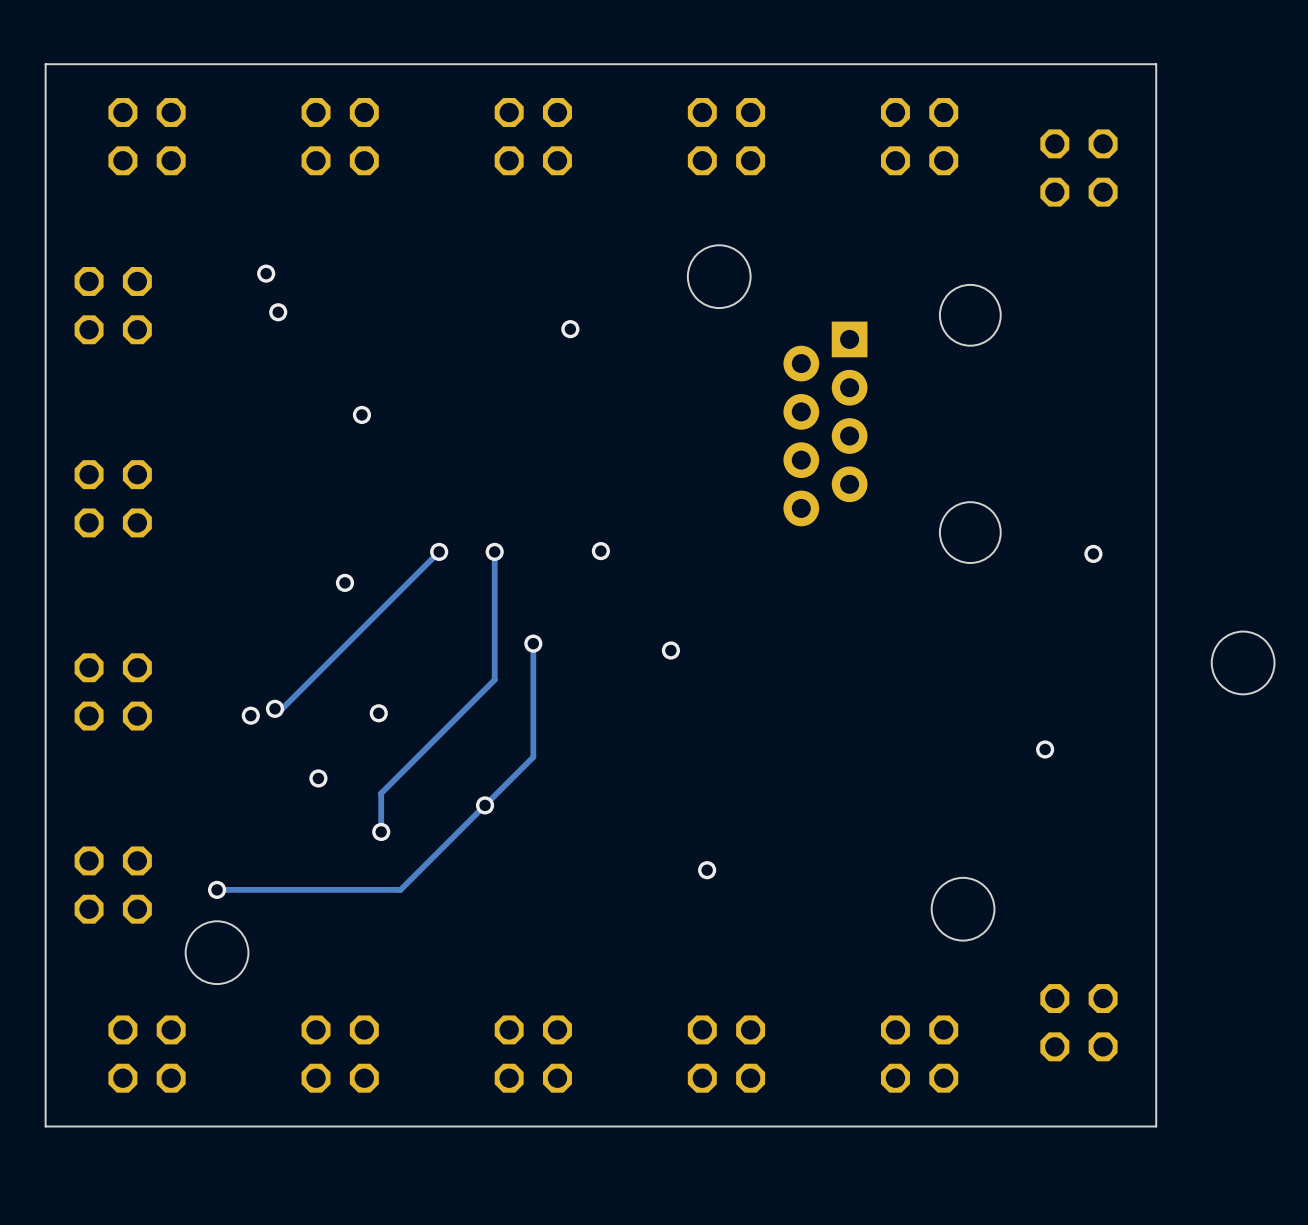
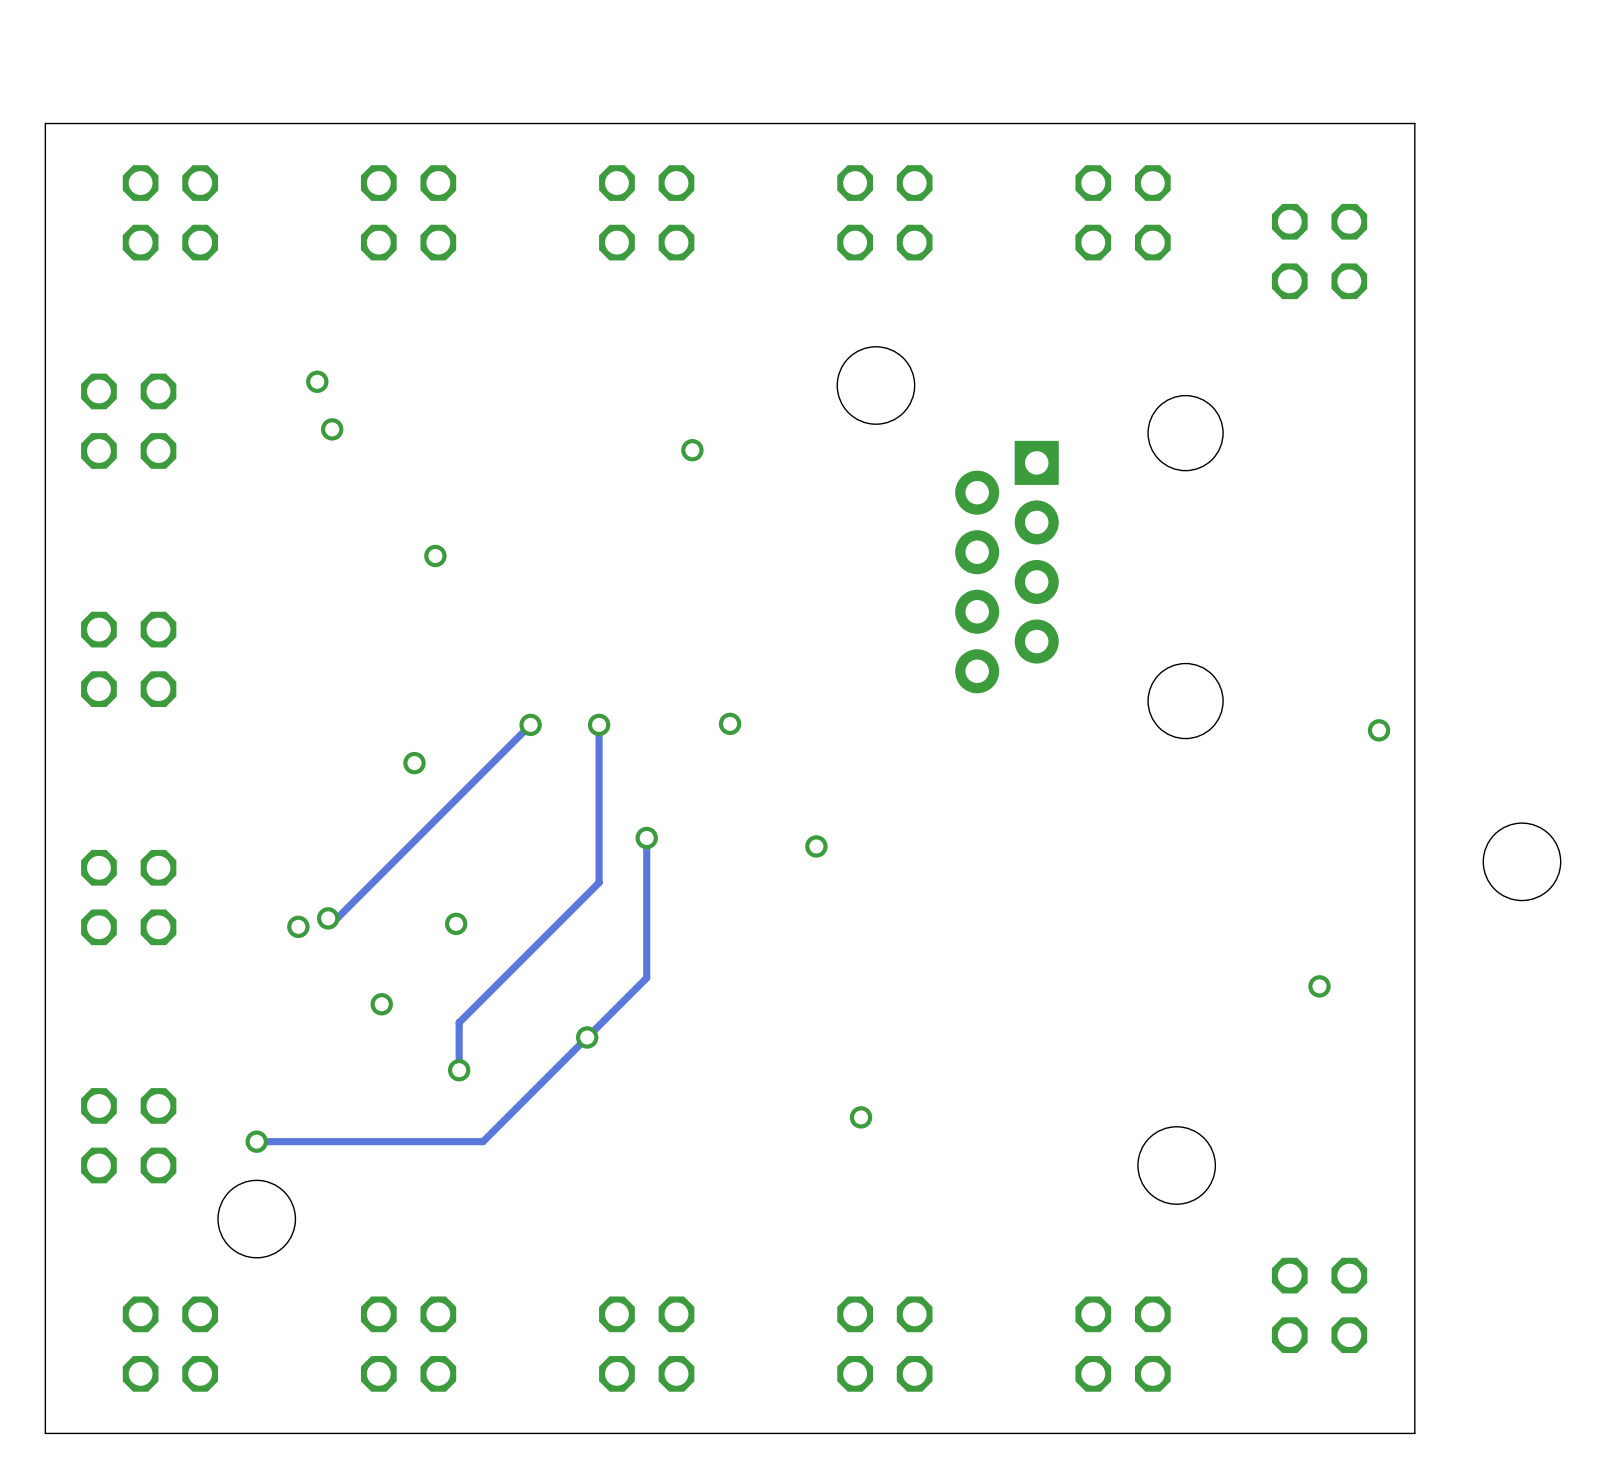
via position: (1093, 553) -> (1379, 730)
via position: (1045, 749) -> (1319, 986)

